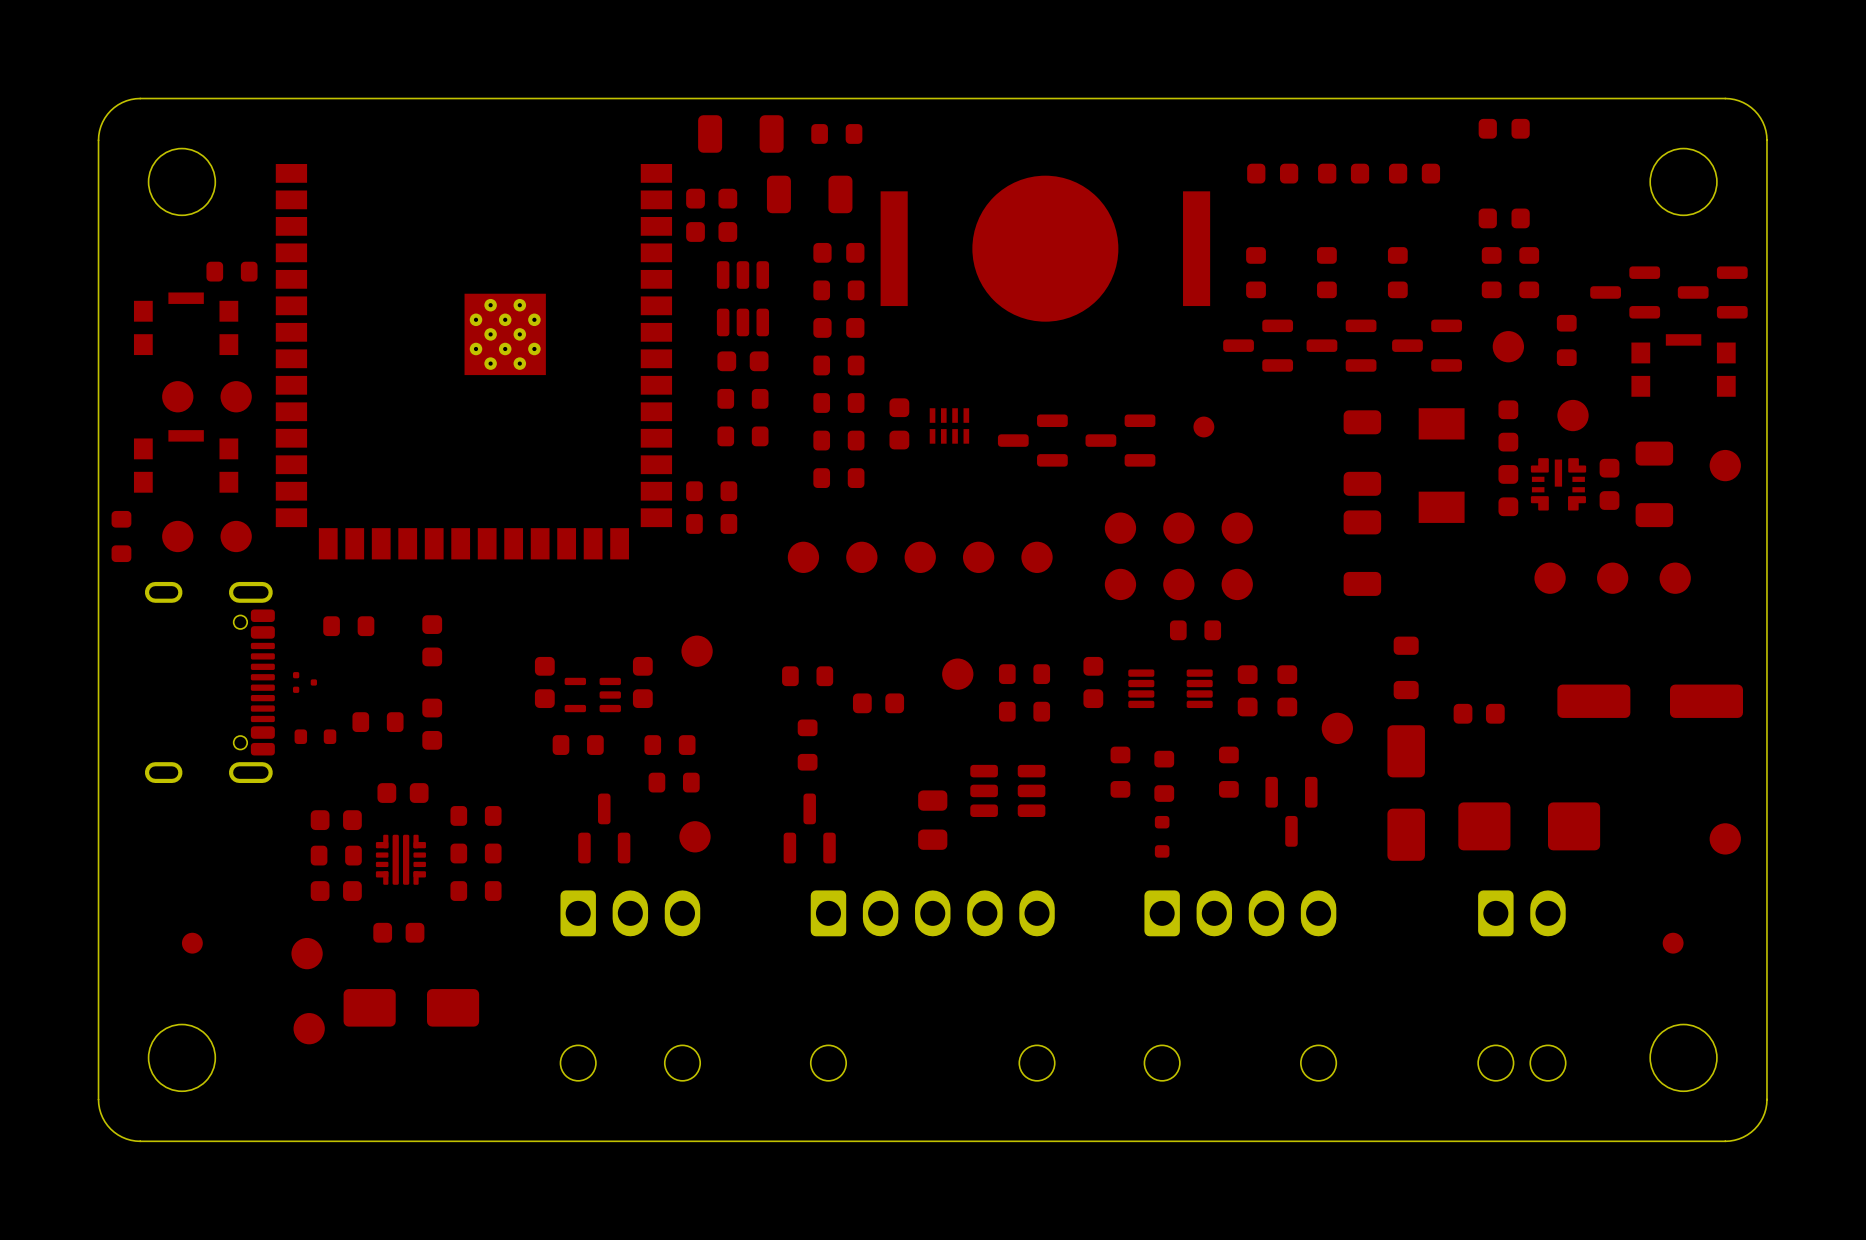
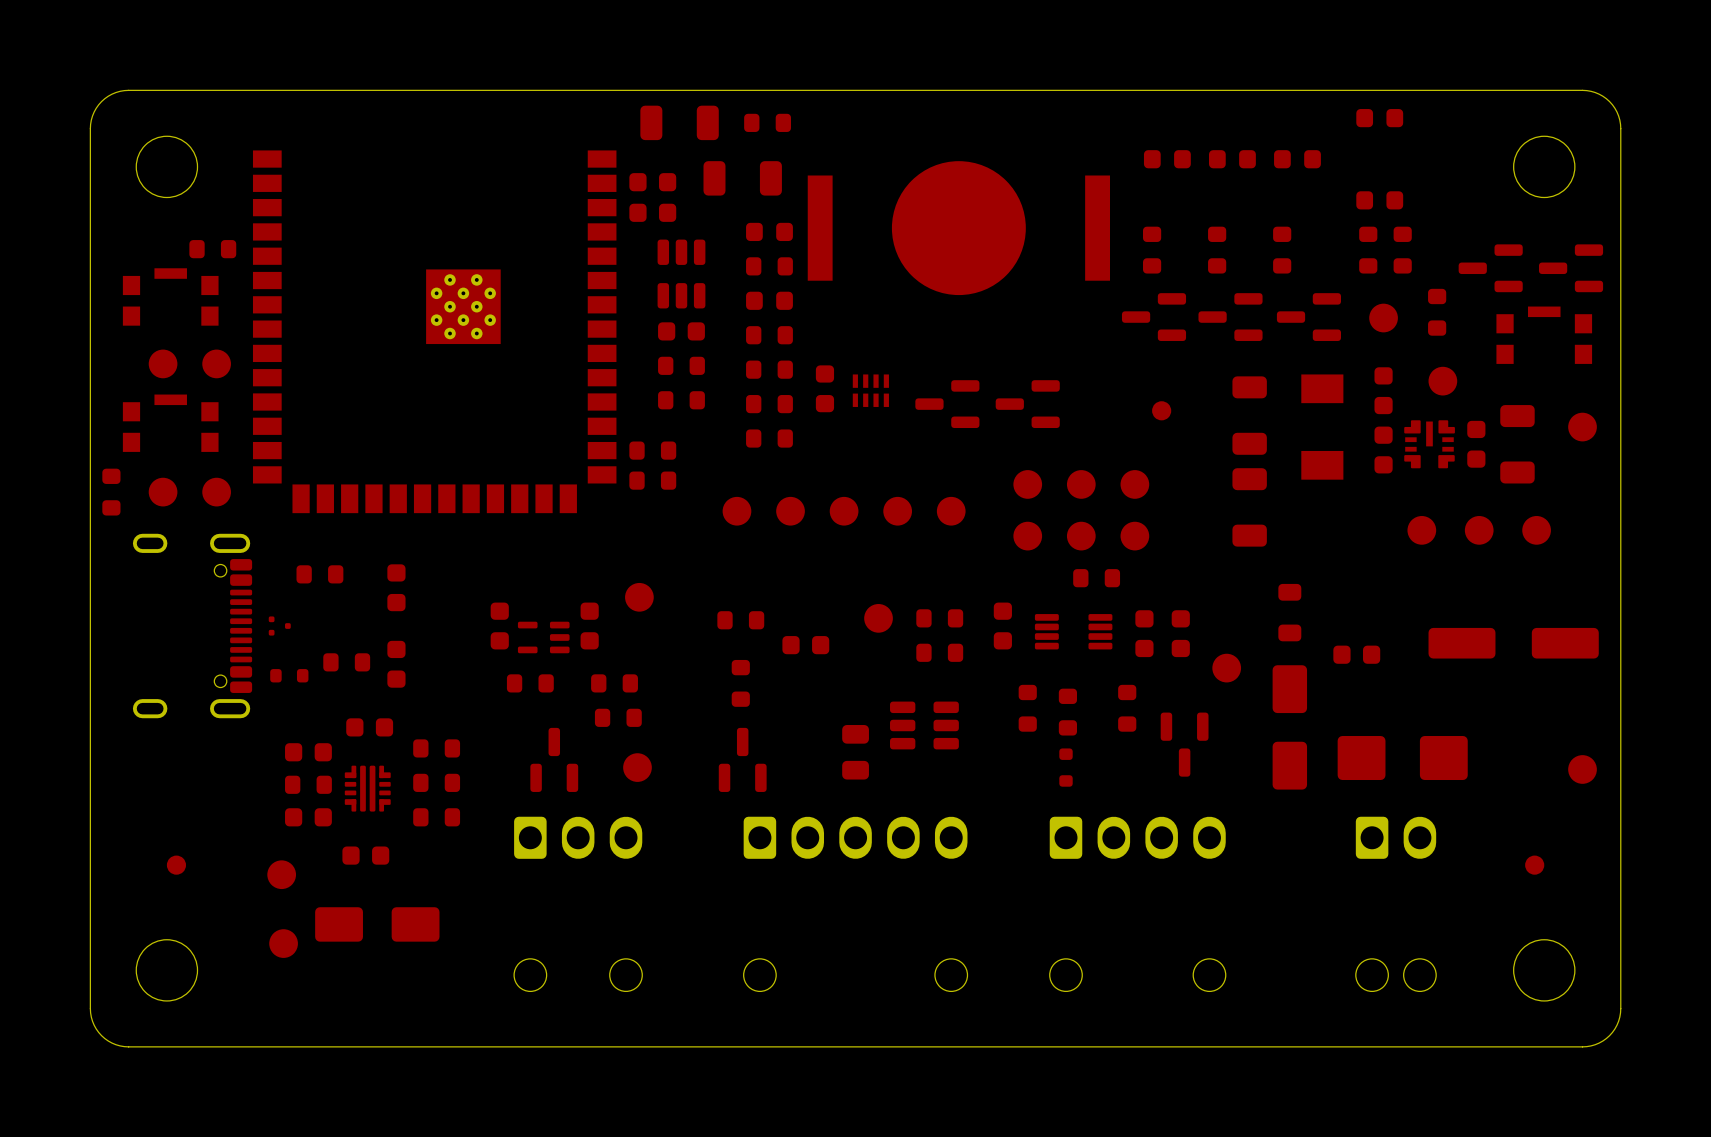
part position: (1203, 426) -> (1161, 410)

